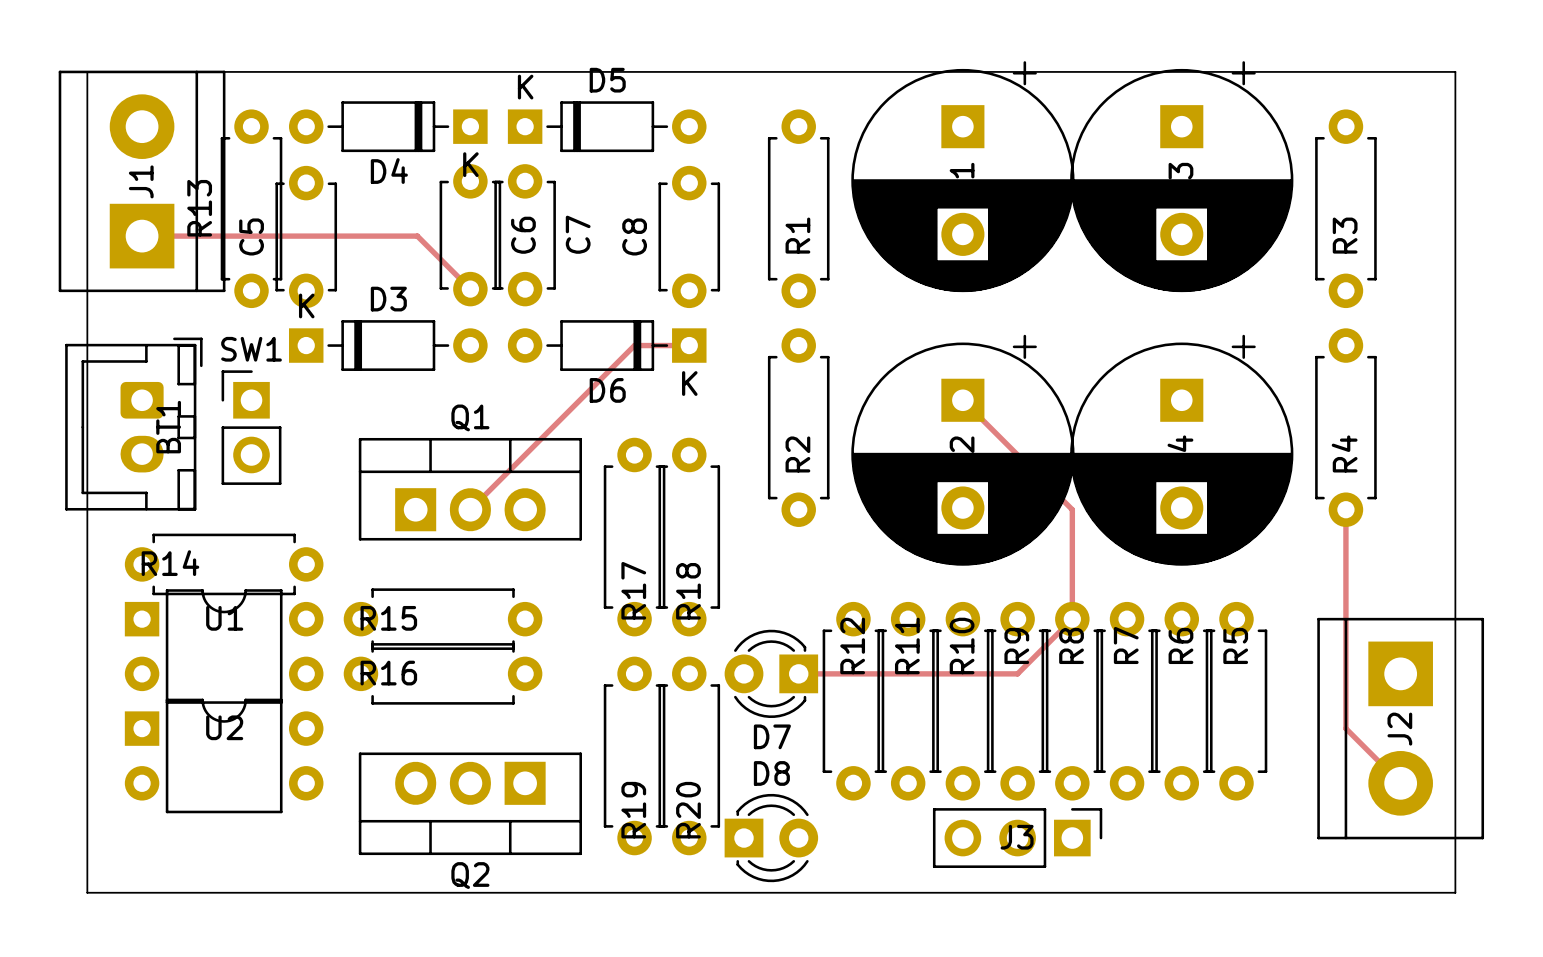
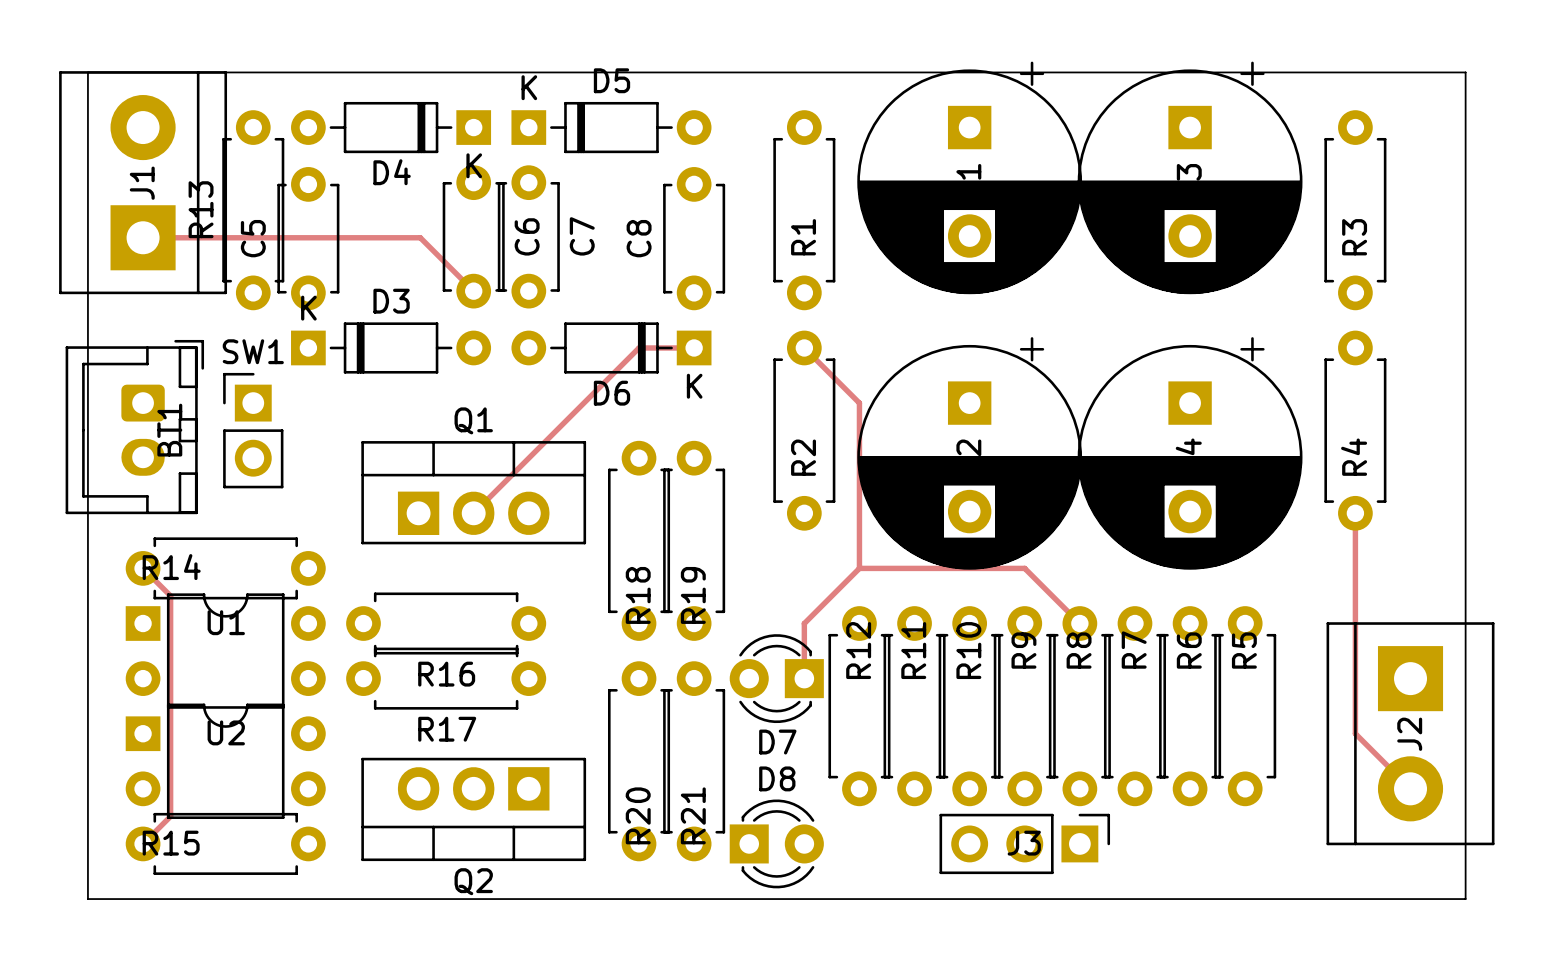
track: none -> (804, 347) (859, 403) (859, 568)
track: (962, 400) (1072, 509) (1072, 619) (1017, 673) (798, 673) -> (859, 568) (804, 623) (804, 678)
track: none -> (143, 568) (170, 595) (170, 816) (143, 843)
track: none -> (859, 568) (1024, 568) (1079, 623)
R17 name: R17 (633, 590) -> R18 (638, 595)
R18 name: R18 (688, 591) -> R19 (693, 595)
R15 name: R15 (388, 618) -> R16 (446, 674)
R16 name: R16 (388, 673) -> R17 (447, 729)
R19 name: R19 (633, 810) -> R20 (638, 815)
R20 name: R20 (688, 810) -> R21 (693, 815)
R15: none -> (225, 843)

